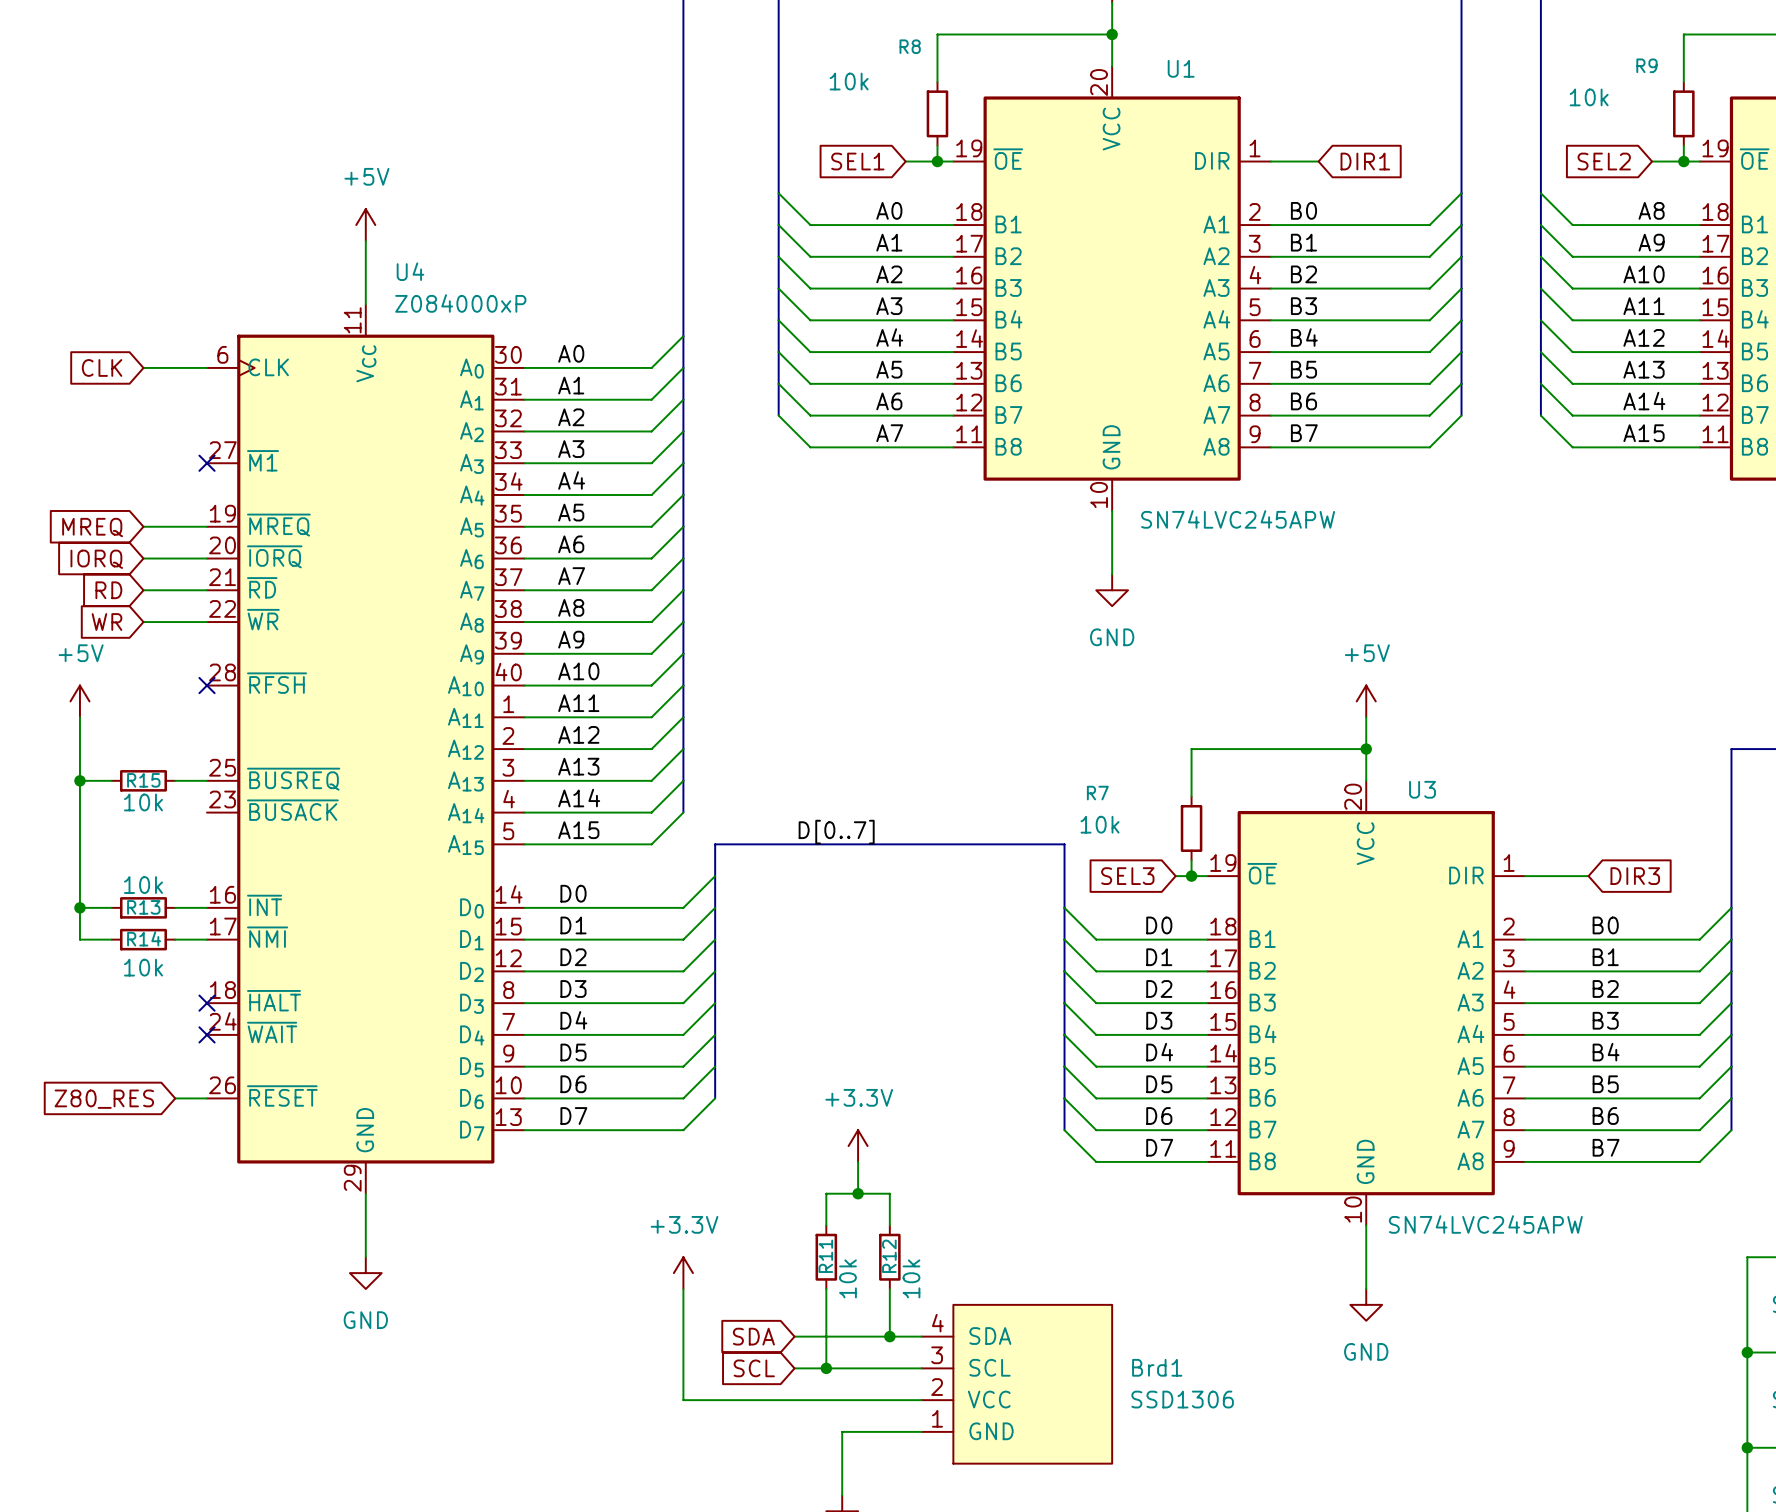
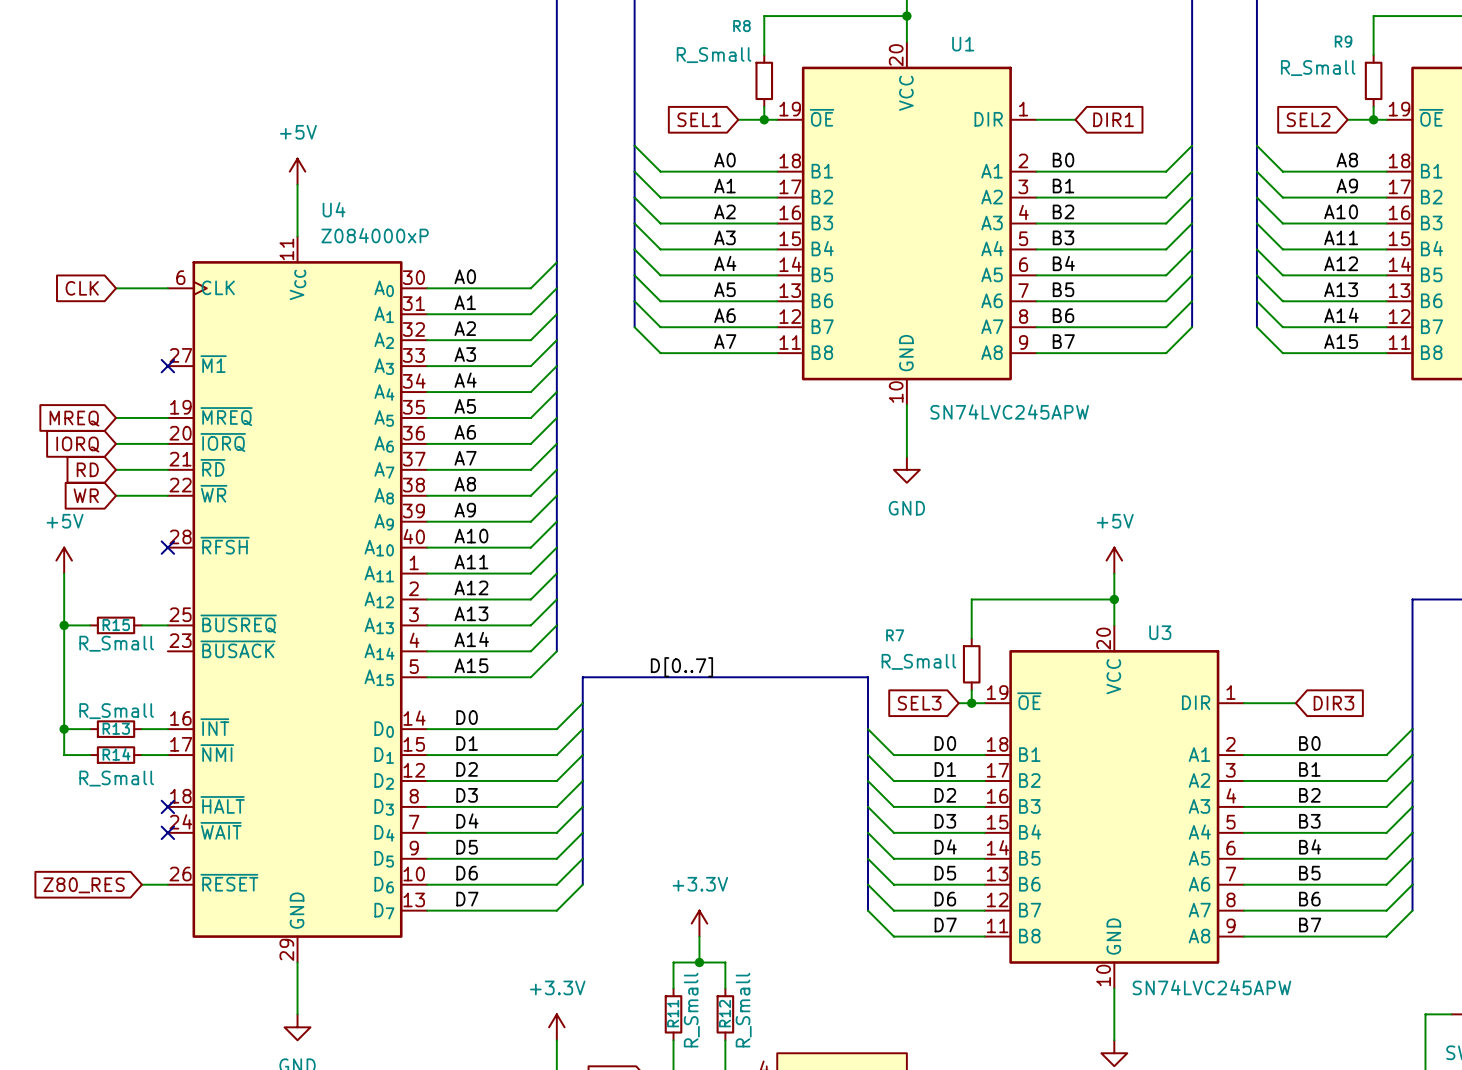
R8 value: 10k (849, 81) -> R_Small (714, 55)
R9 value: 10k (1589, 97) -> R_Small (1318, 68)
R15 value: 10k (143, 802) -> R_Small (116, 643)
R7 value: 10k (1100, 824) -> R_Small (918, 661)
R13 value: 10k (143, 885) -> R_Small (116, 711)
R14 value: 10k (143, 967) -> R_Small (116, 778)
R11 value: 10k (847, 1278) -> R_Small (691, 1010)
R12 value: 10k (911, 1278) -> R_Small (743, 1010)

